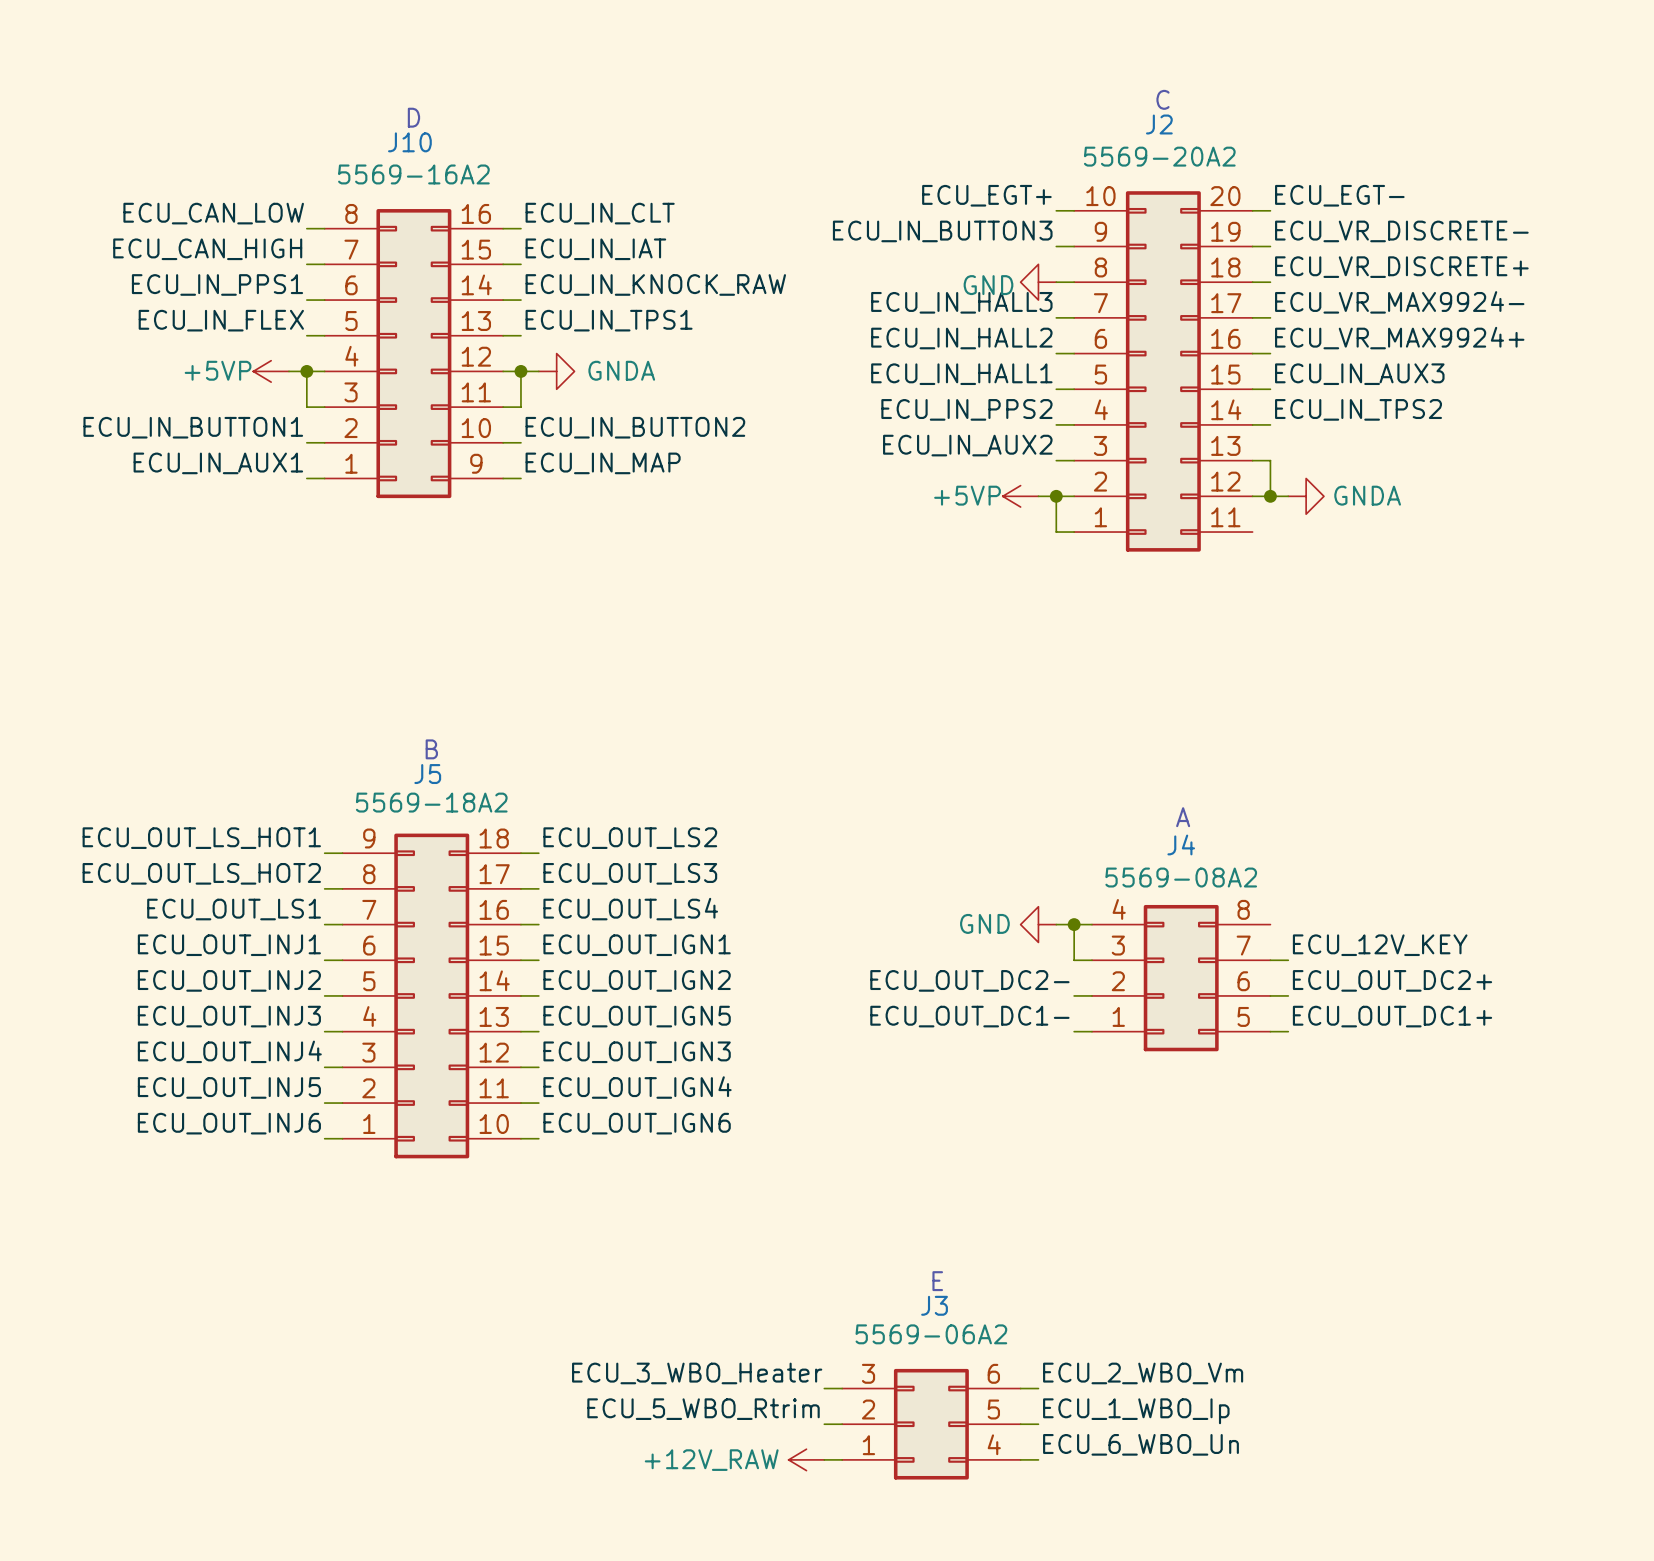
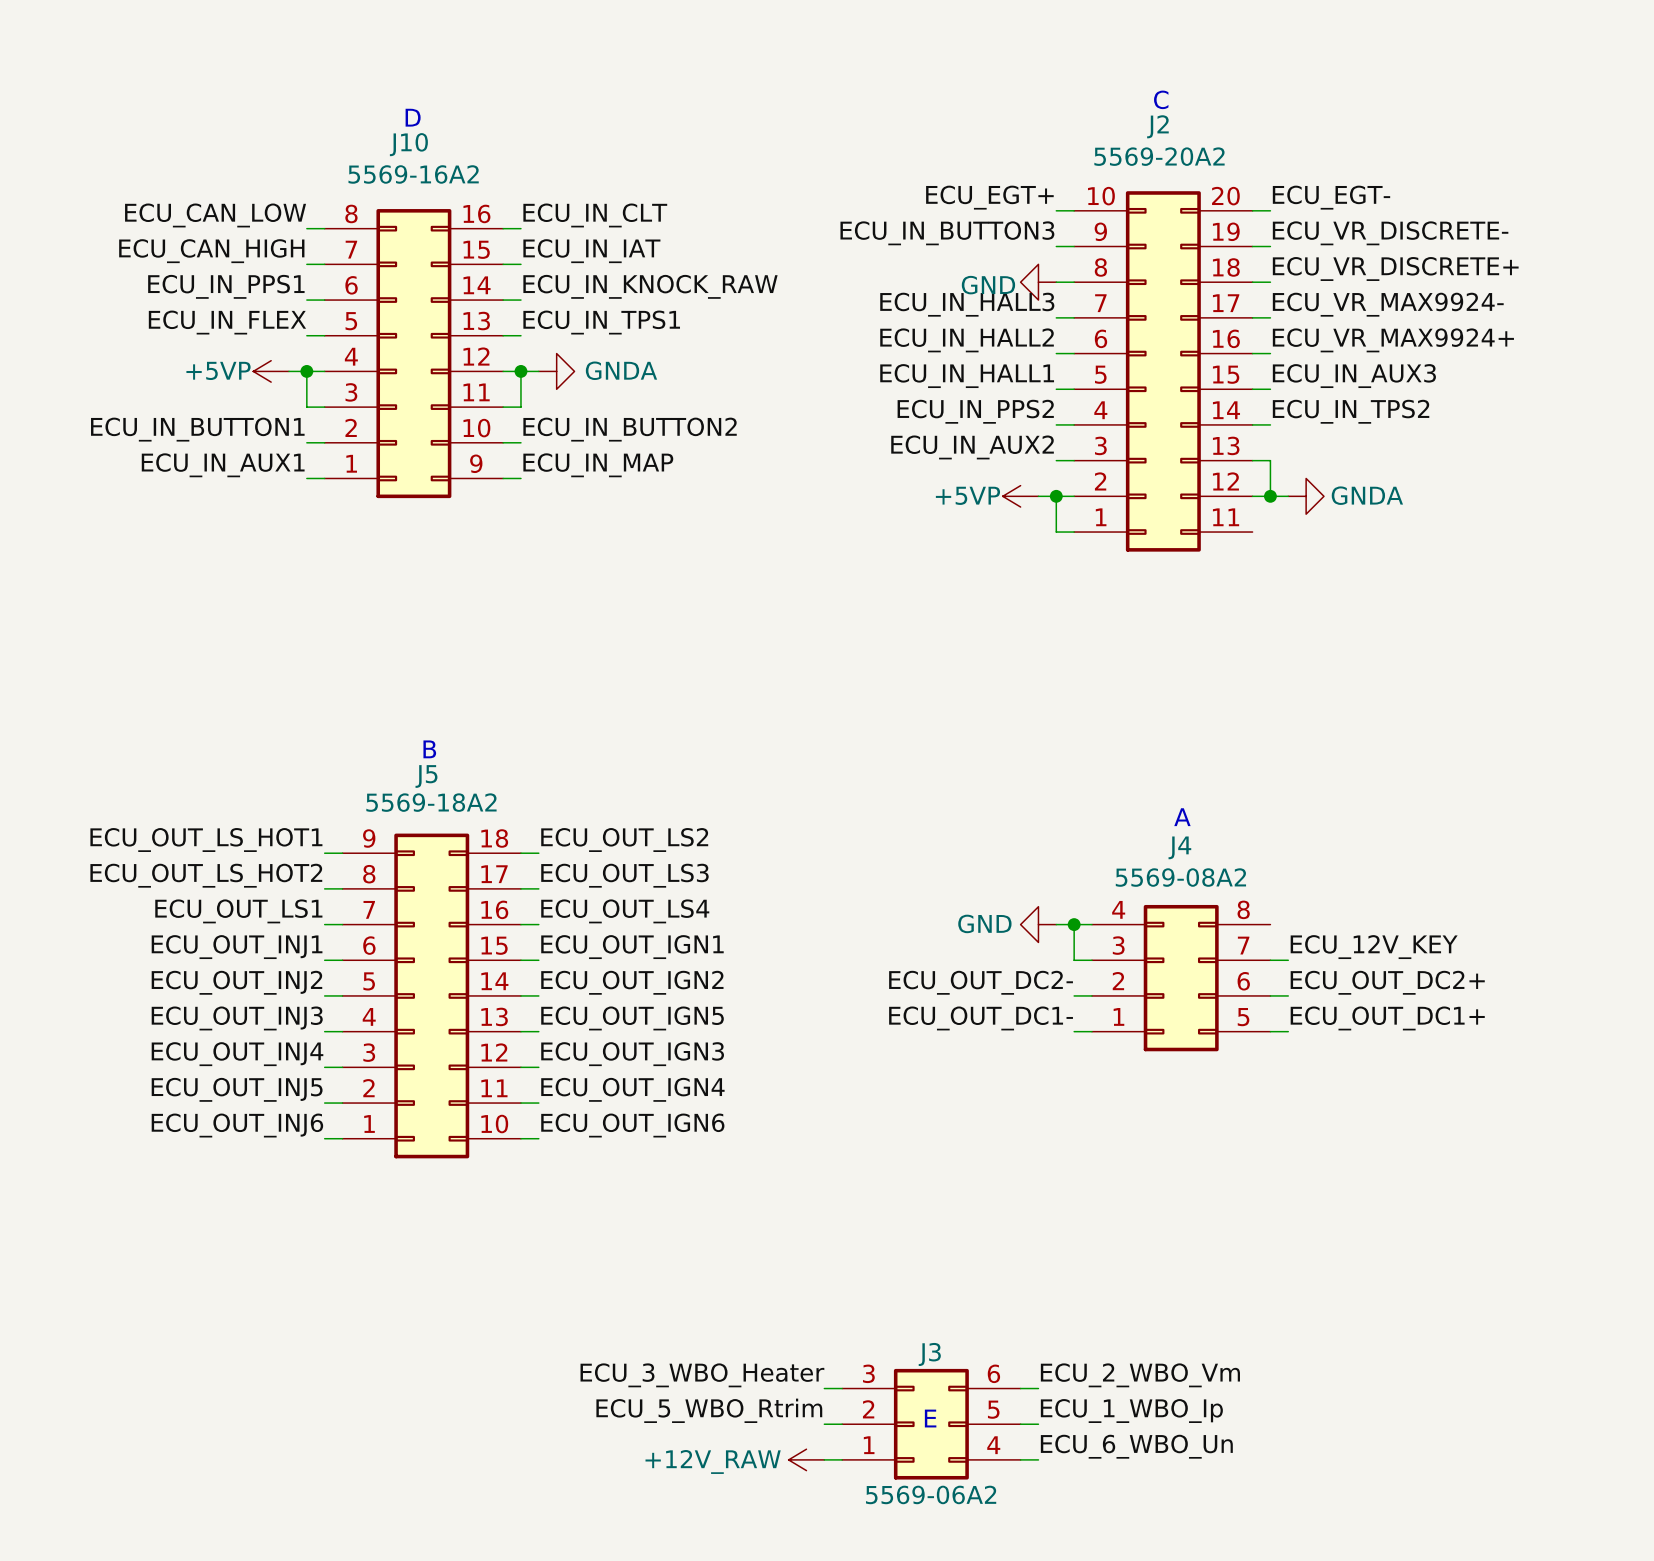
text position: E (937, 1281) -> E (930, 1418)
J3 name position: J3 (934, 1305) -> J3 (929, 1354)
J3 value position: 5569-06A2 (931, 1334) -> 5569-06A2 (931, 1494)

